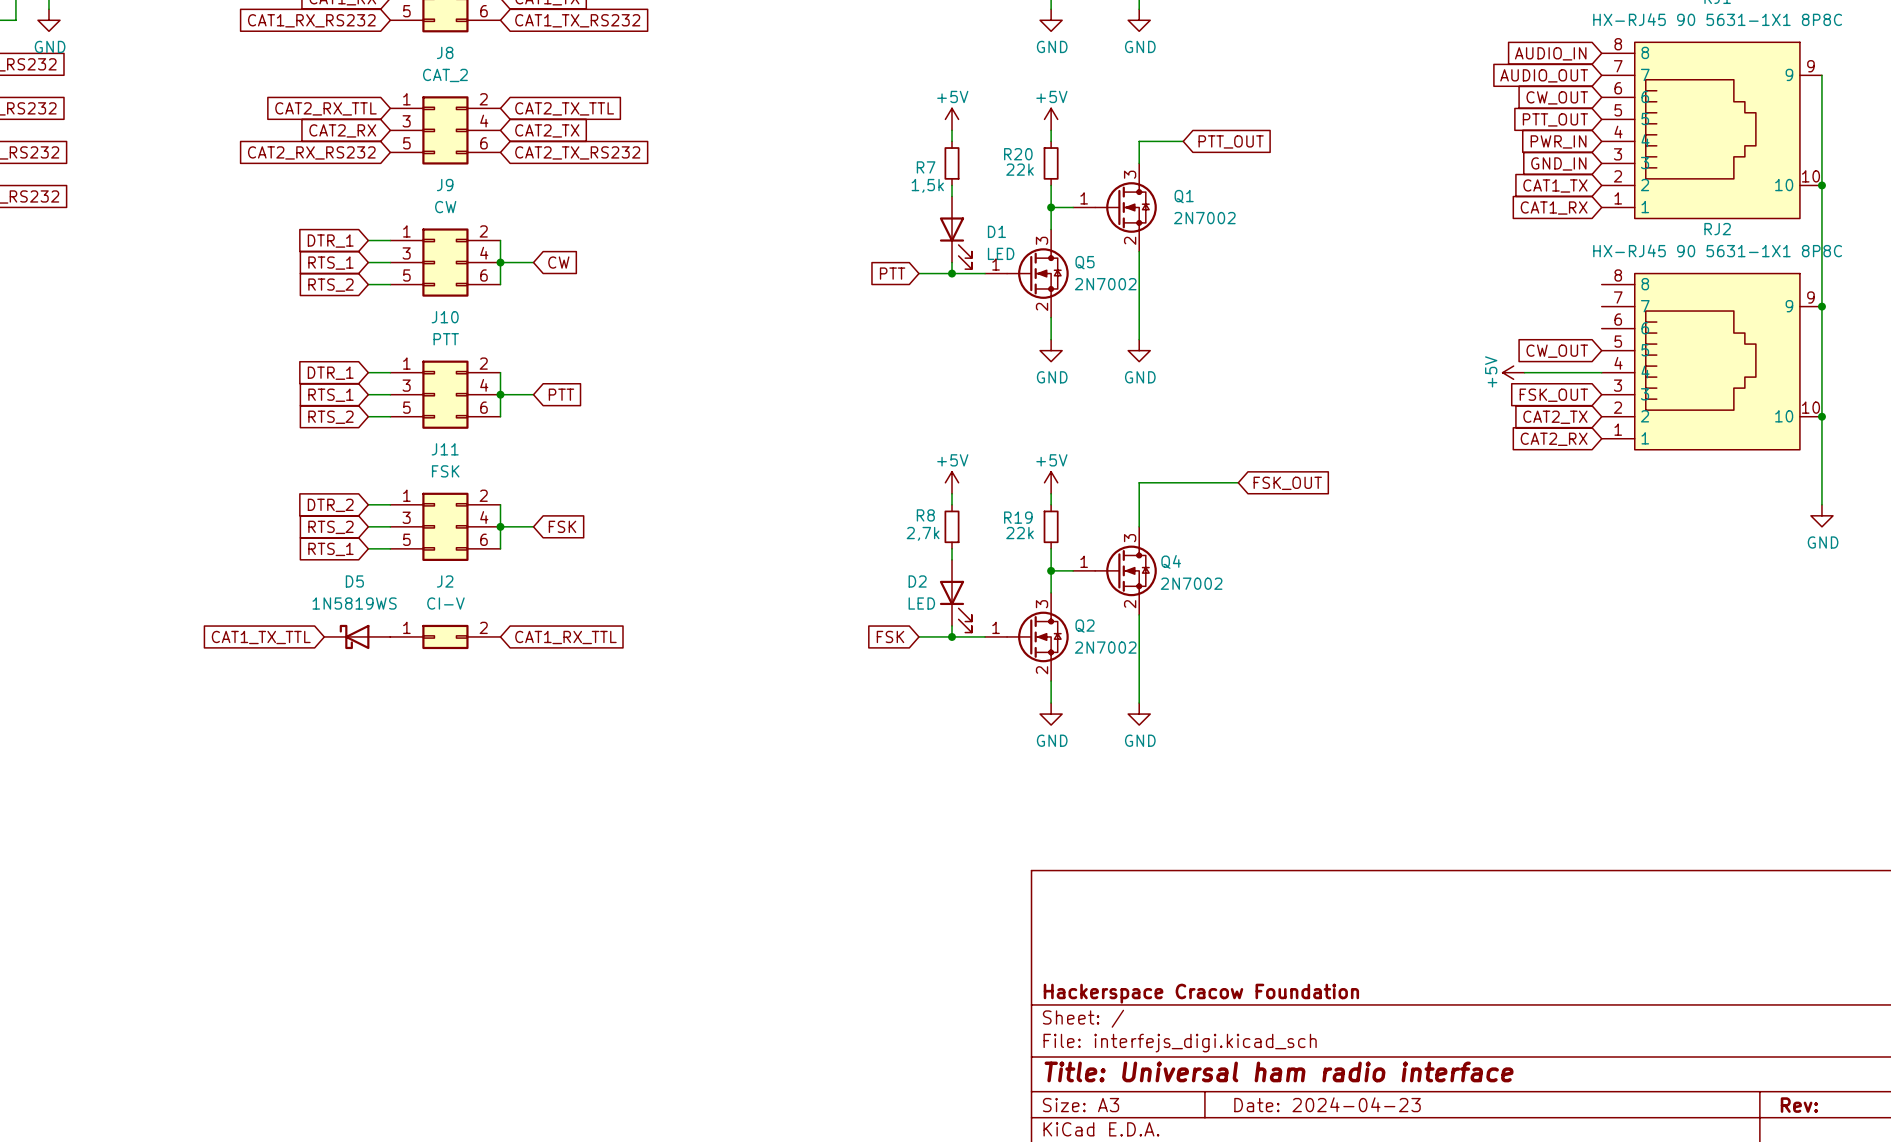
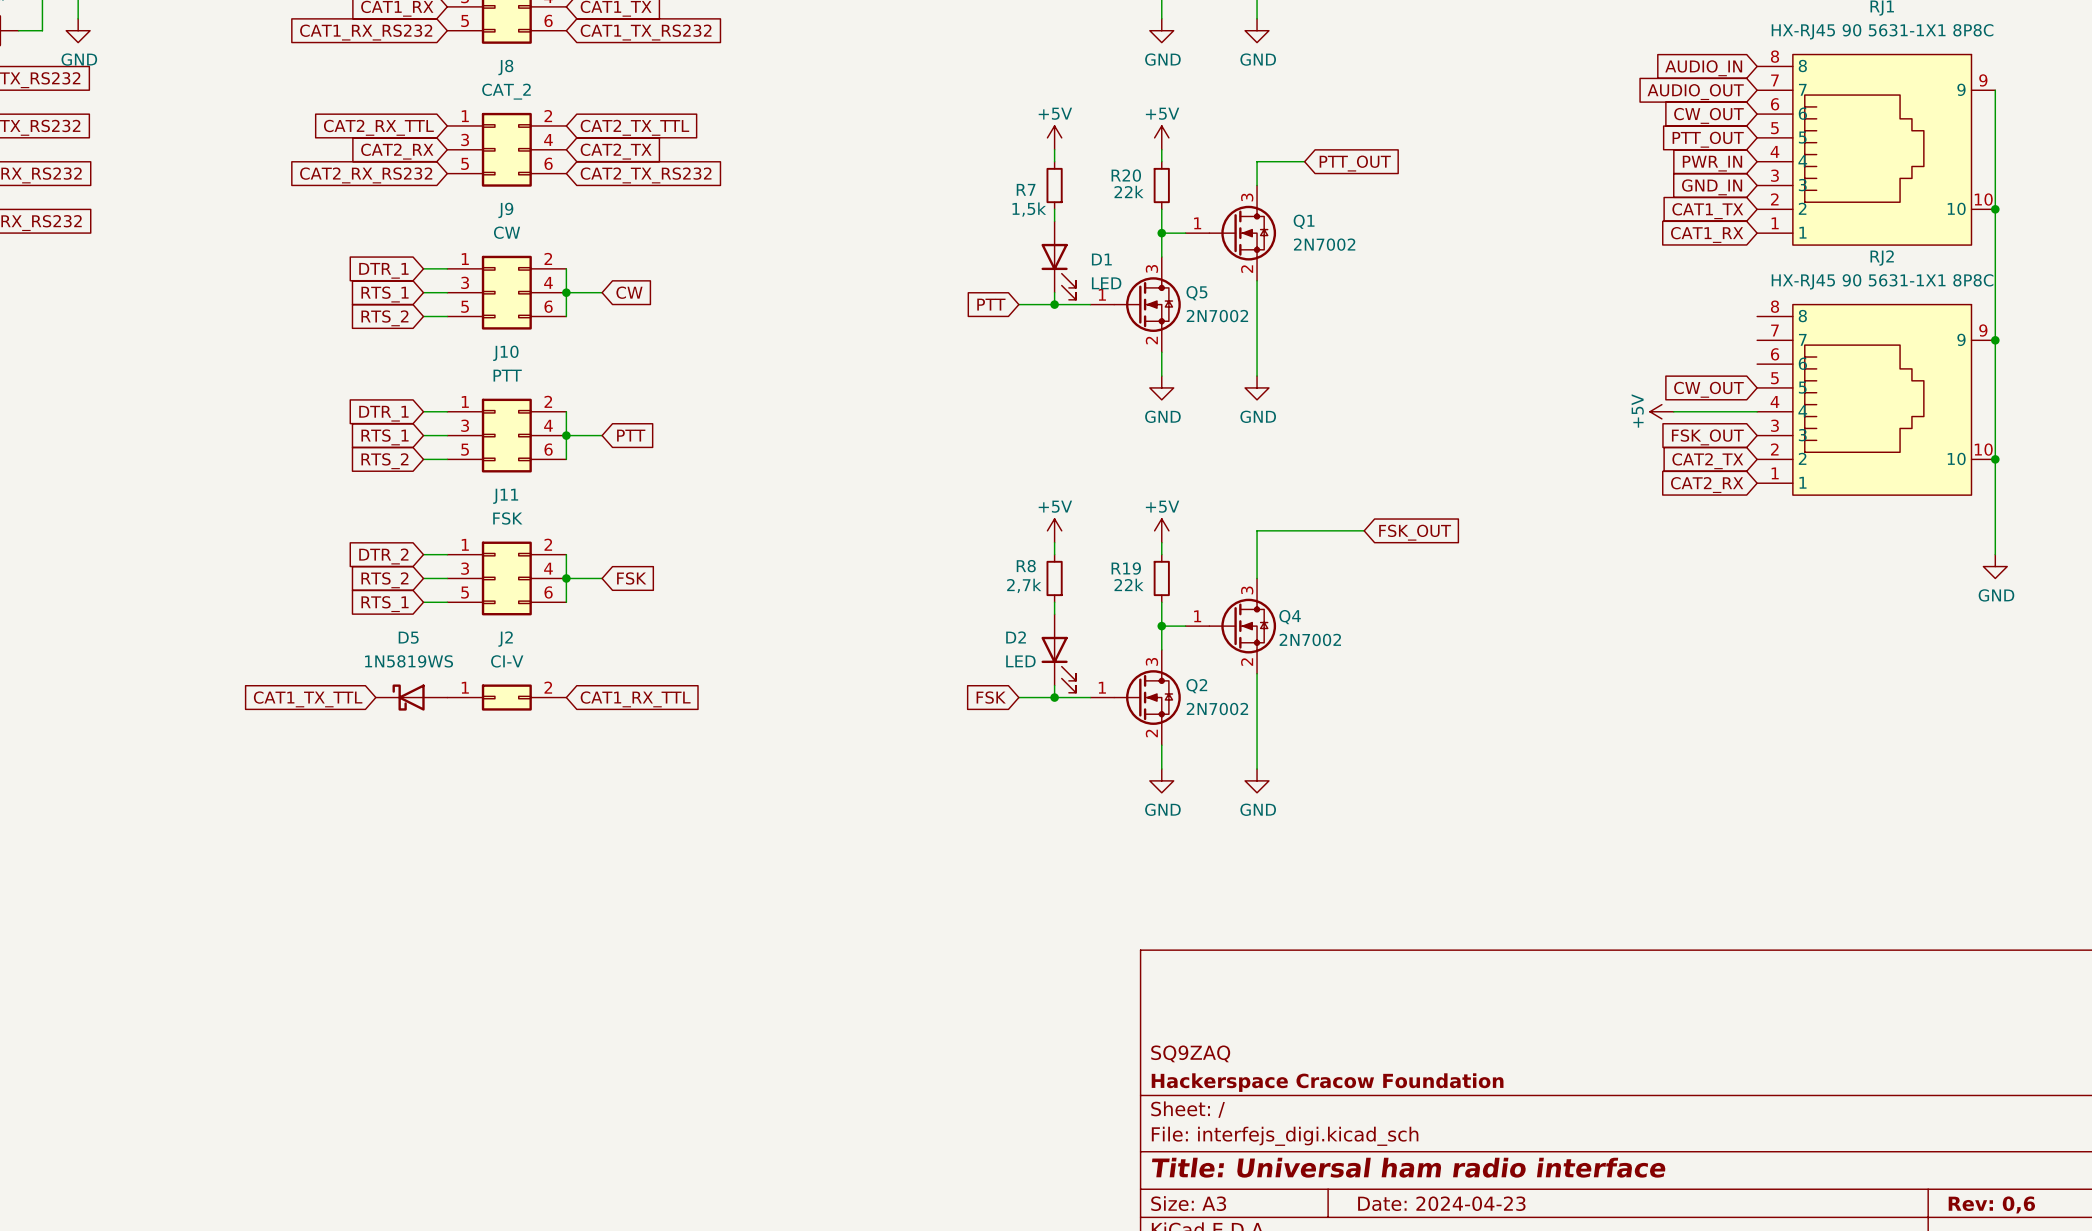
title block: none -> SQ9ZAQ (1190, 1053)
title block: Rev: (1799, 1105) -> Rev: 0,6 (1991, 1204)

